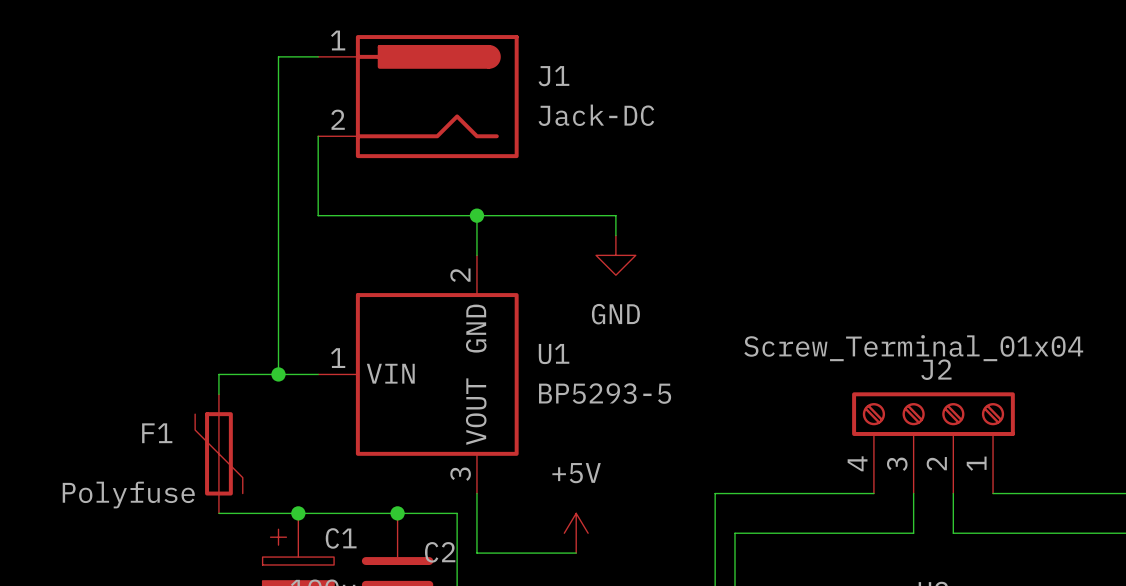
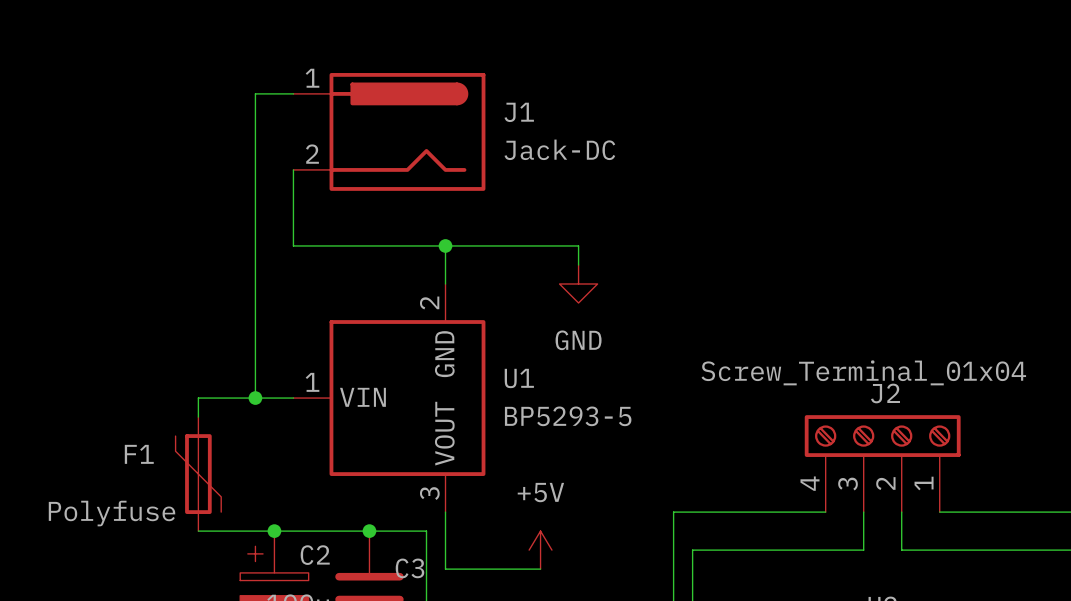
C1 name: C1 (341, 538) -> C2 (315, 555)
C2 name: C2 (440, 552) -> C3 (409, 568)

